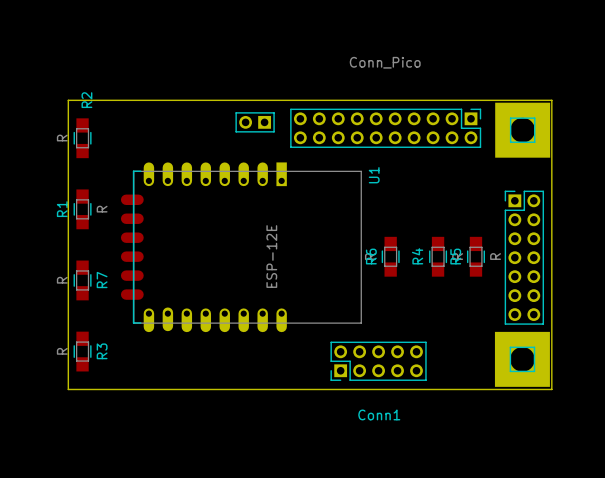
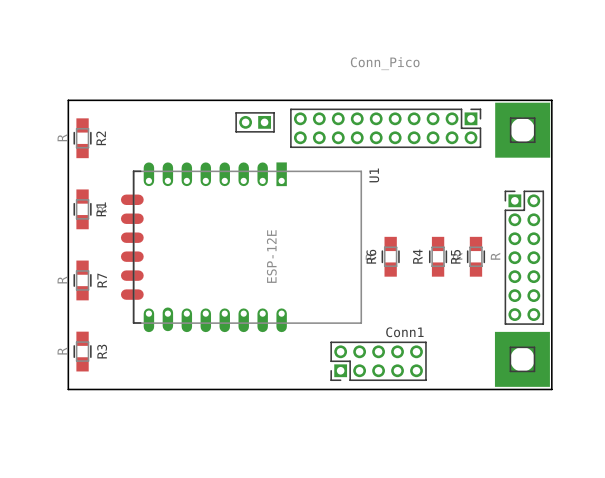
R2 name position: R2 (86, 100) -> R2 (101, 138)
R1 name position: R1 (62, 209) -> R1 (101, 209)
Conn1 name position: Conn1 (379, 414) -> Conn1 (404, 332)

